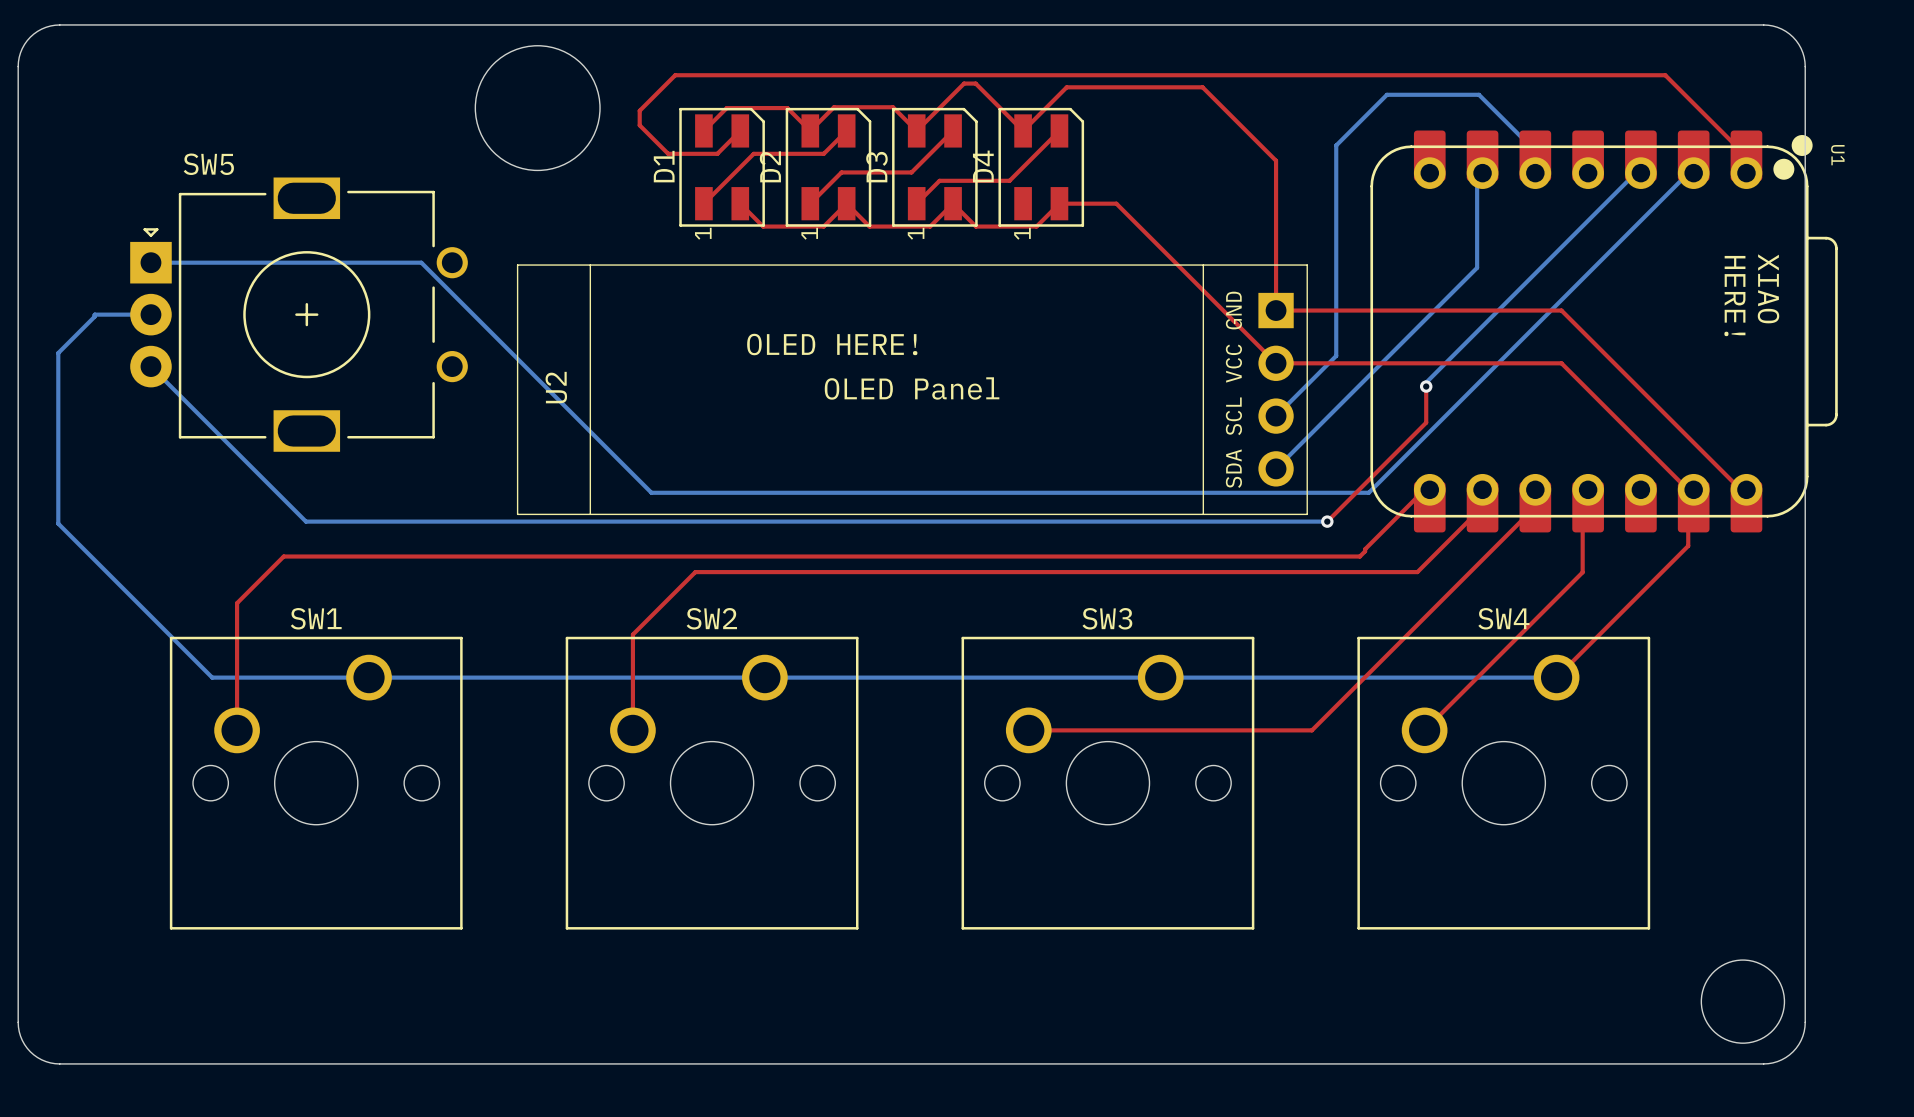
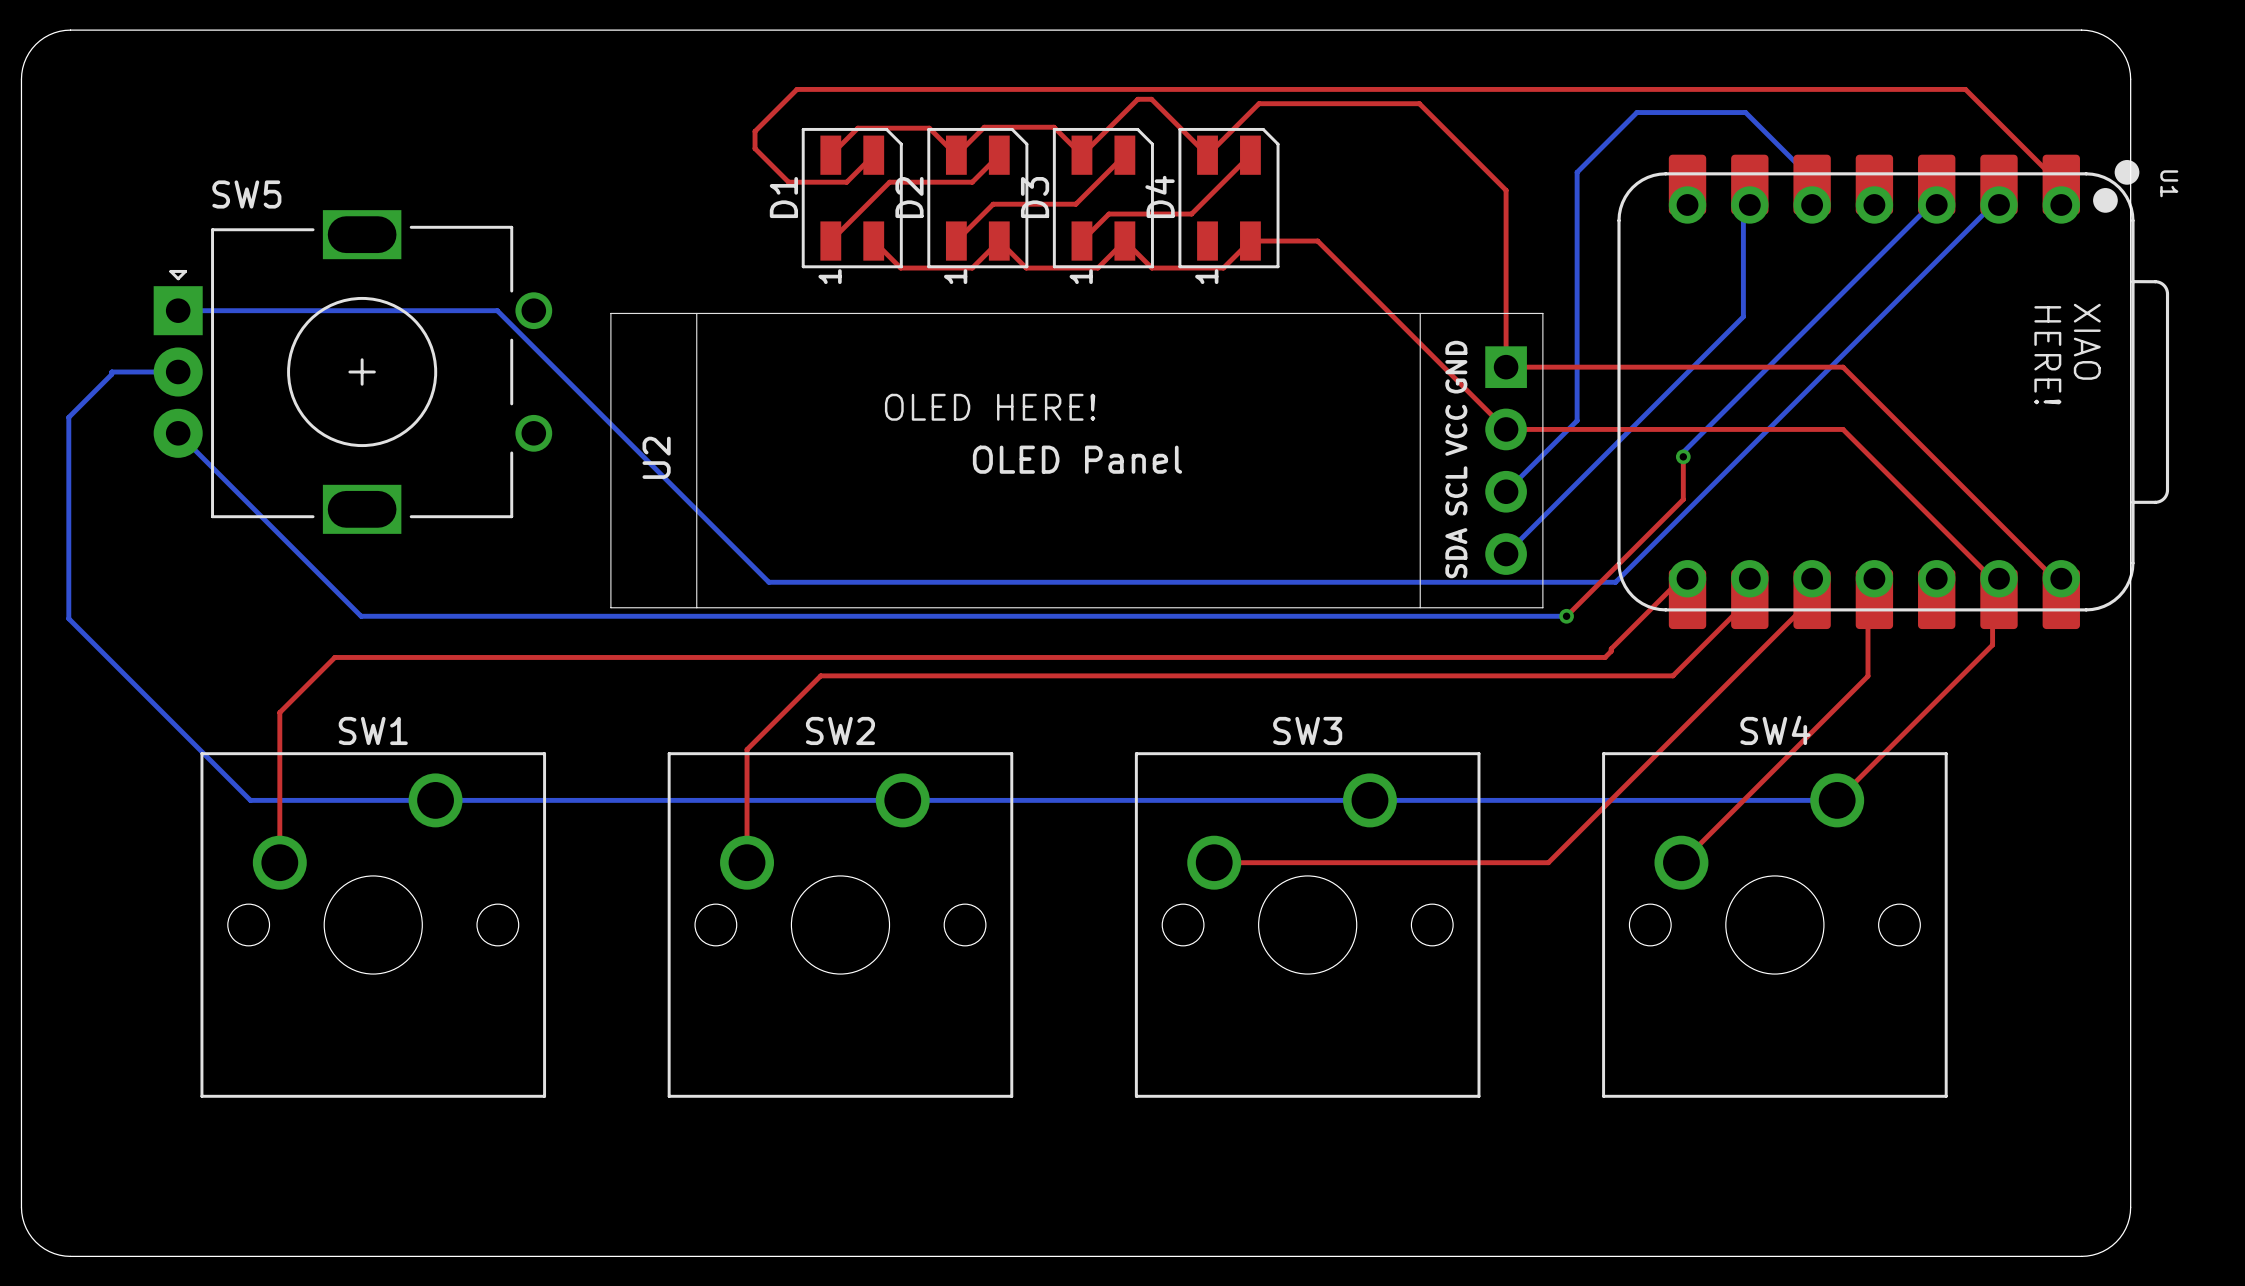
round board edge: [474, 45, 601, 171] -> none
round board edge: [1700, 959, 1785, 1044] -> none

